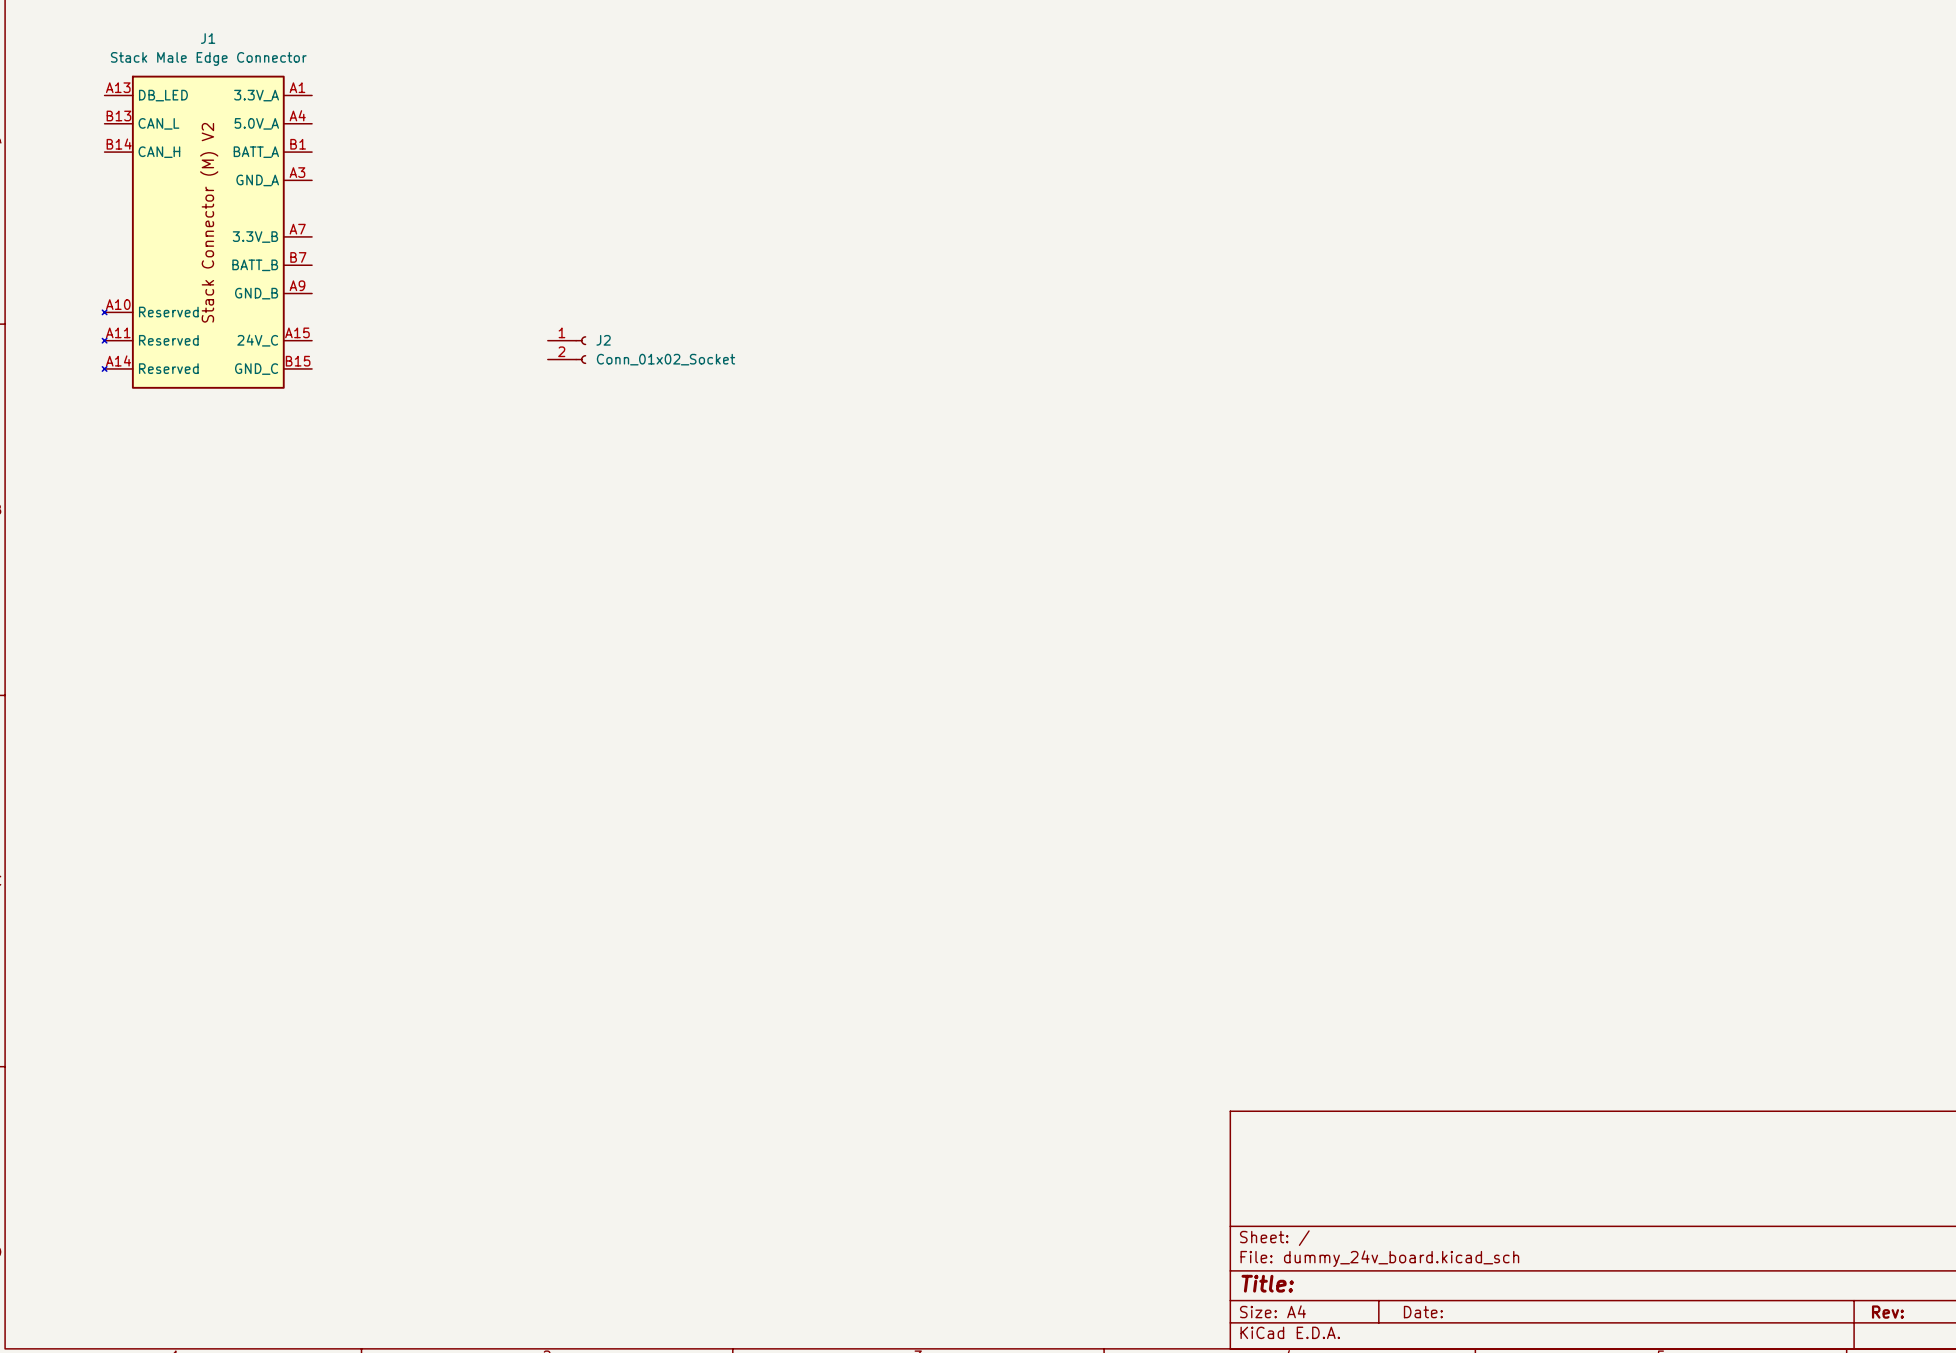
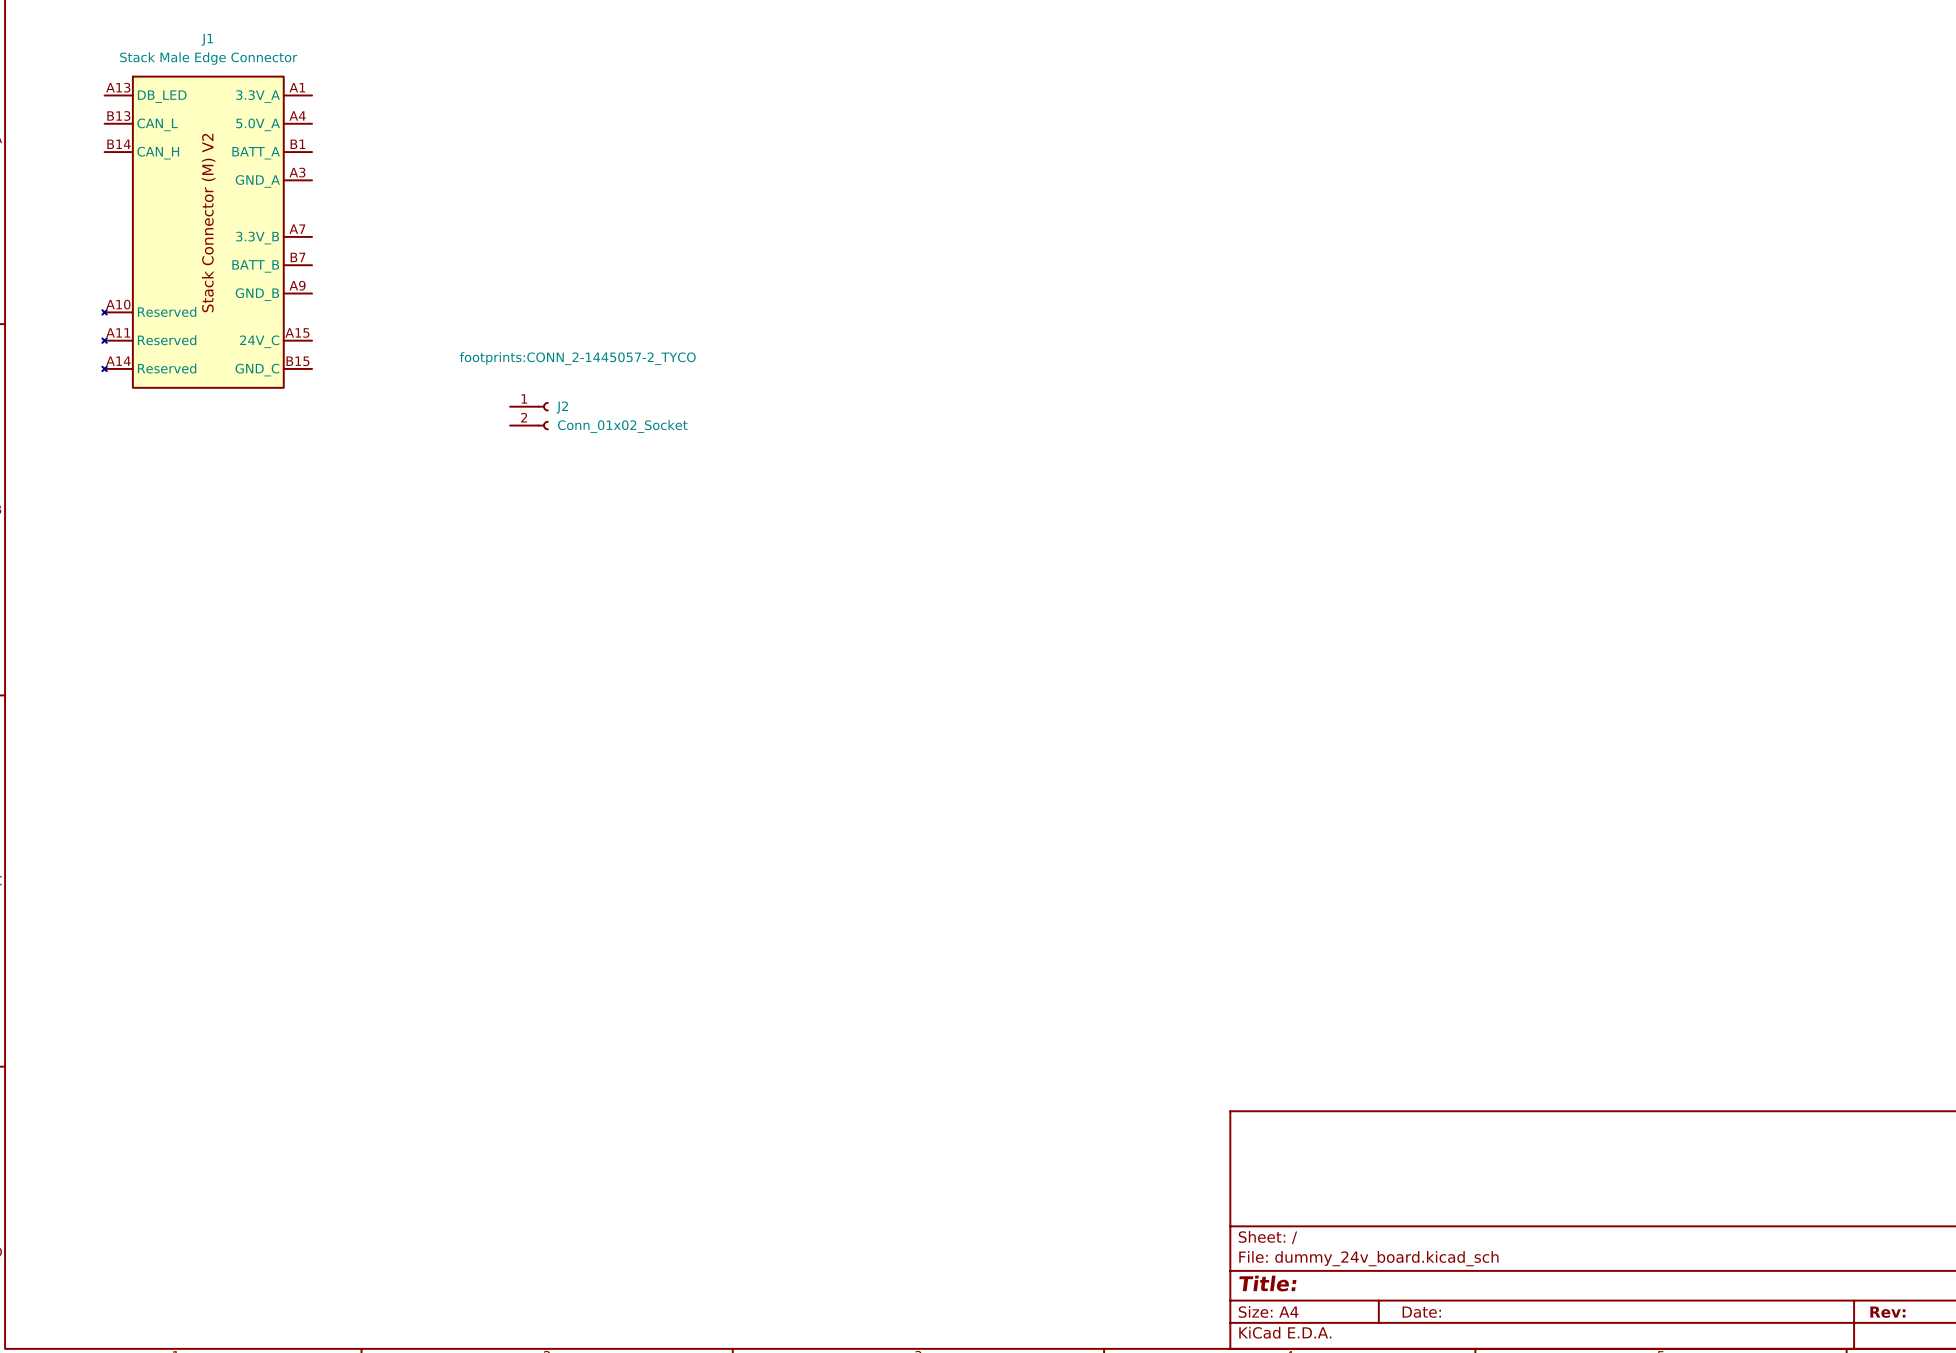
J2 position: (566, 350) -> (529, 416)
J2 text: none -> footprints:CONN_2-1445057-2_TYCO (577, 358)

